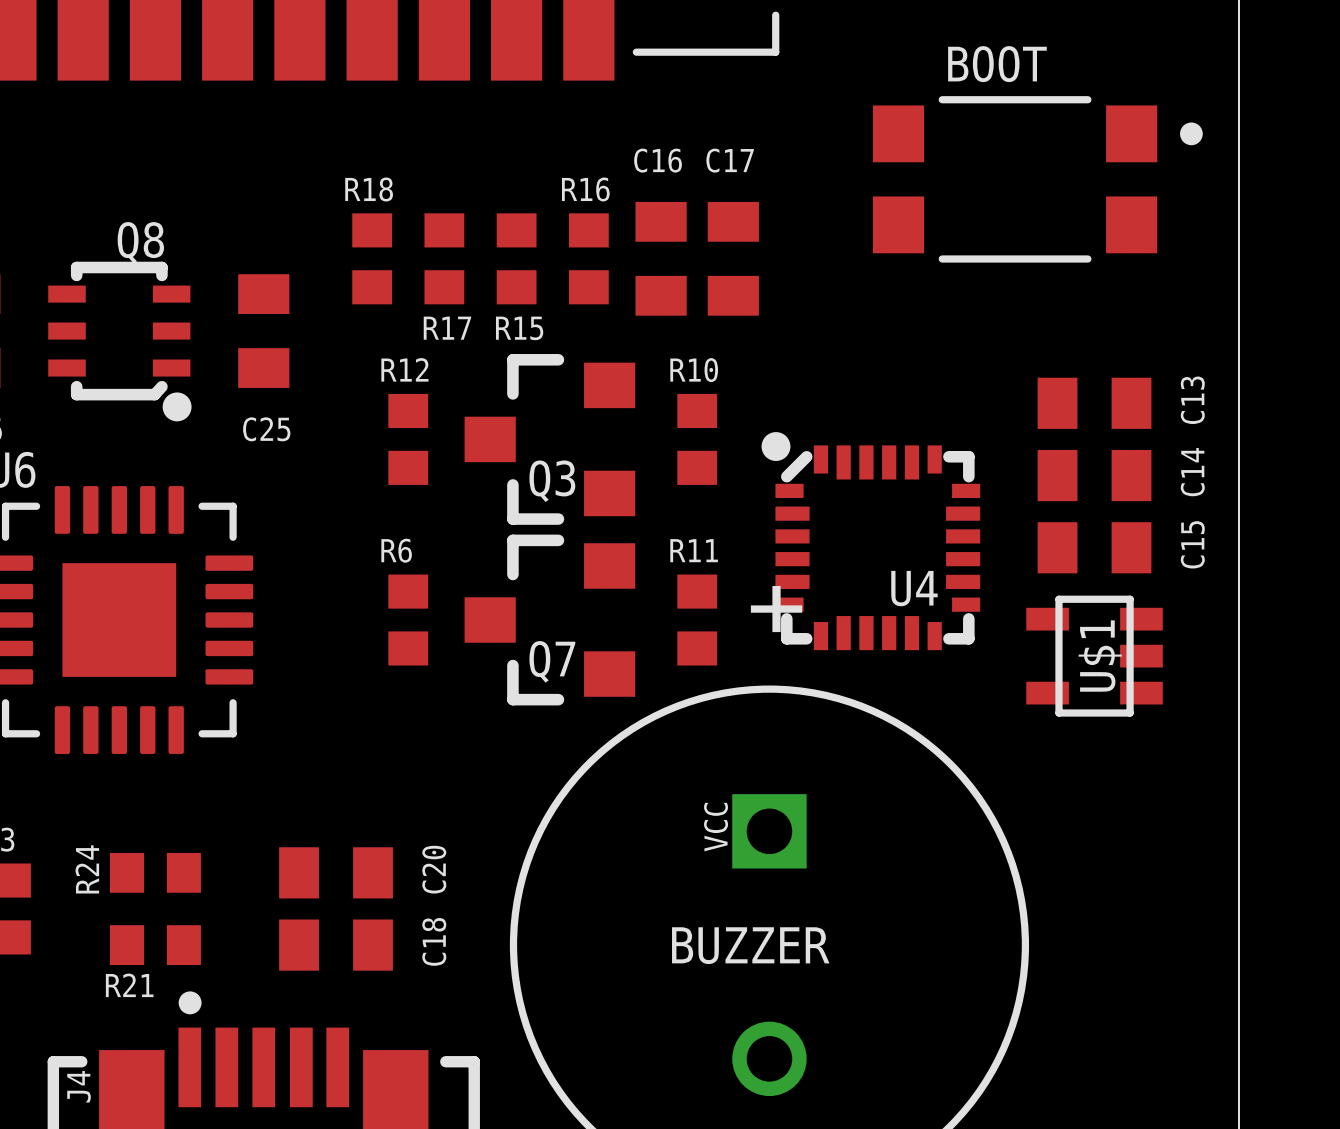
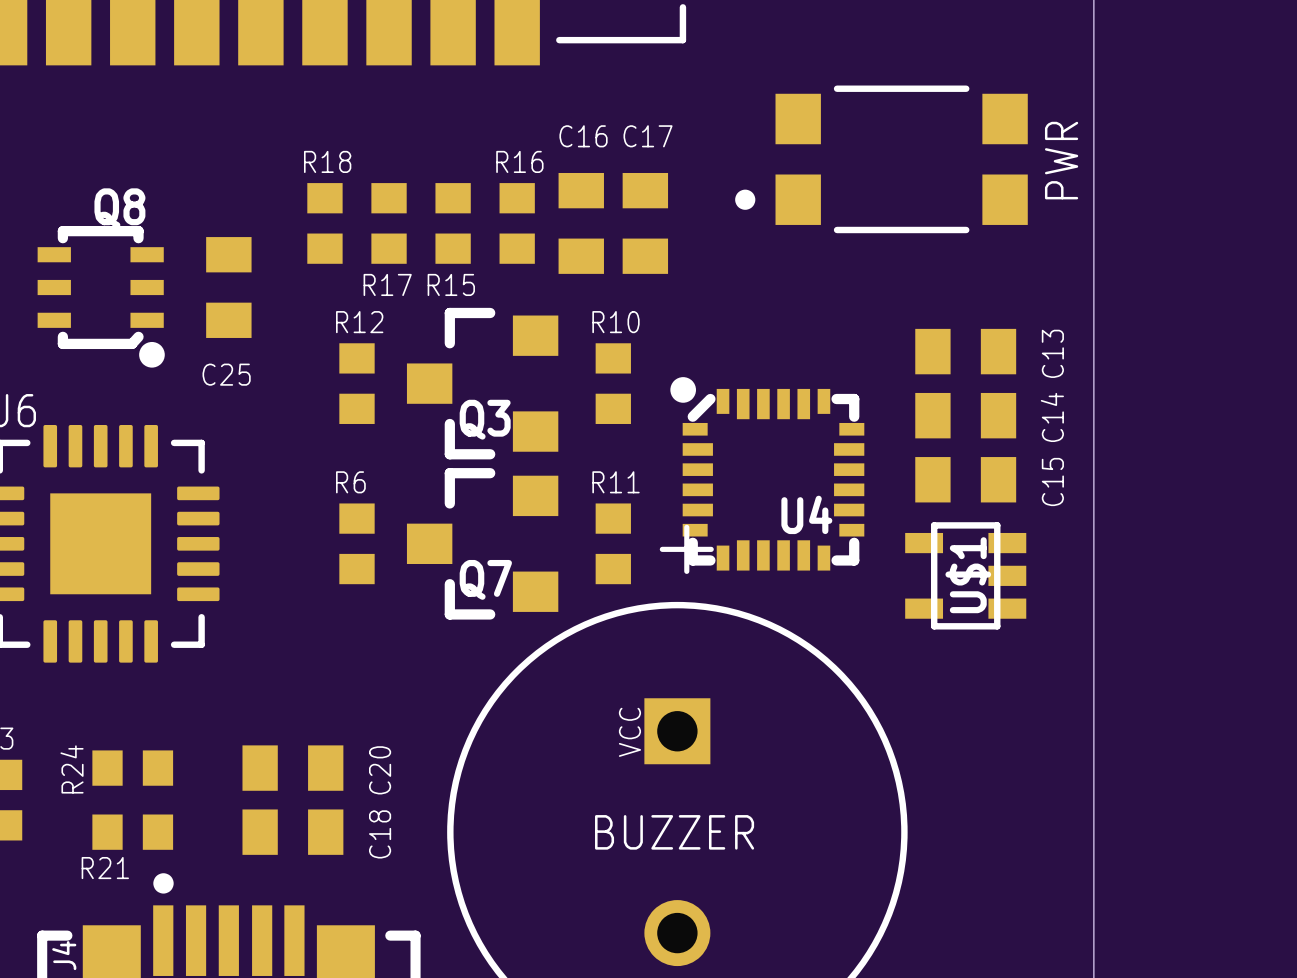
BOOT: (1037, 179) -> none
PWR: none -> (881, 159)

